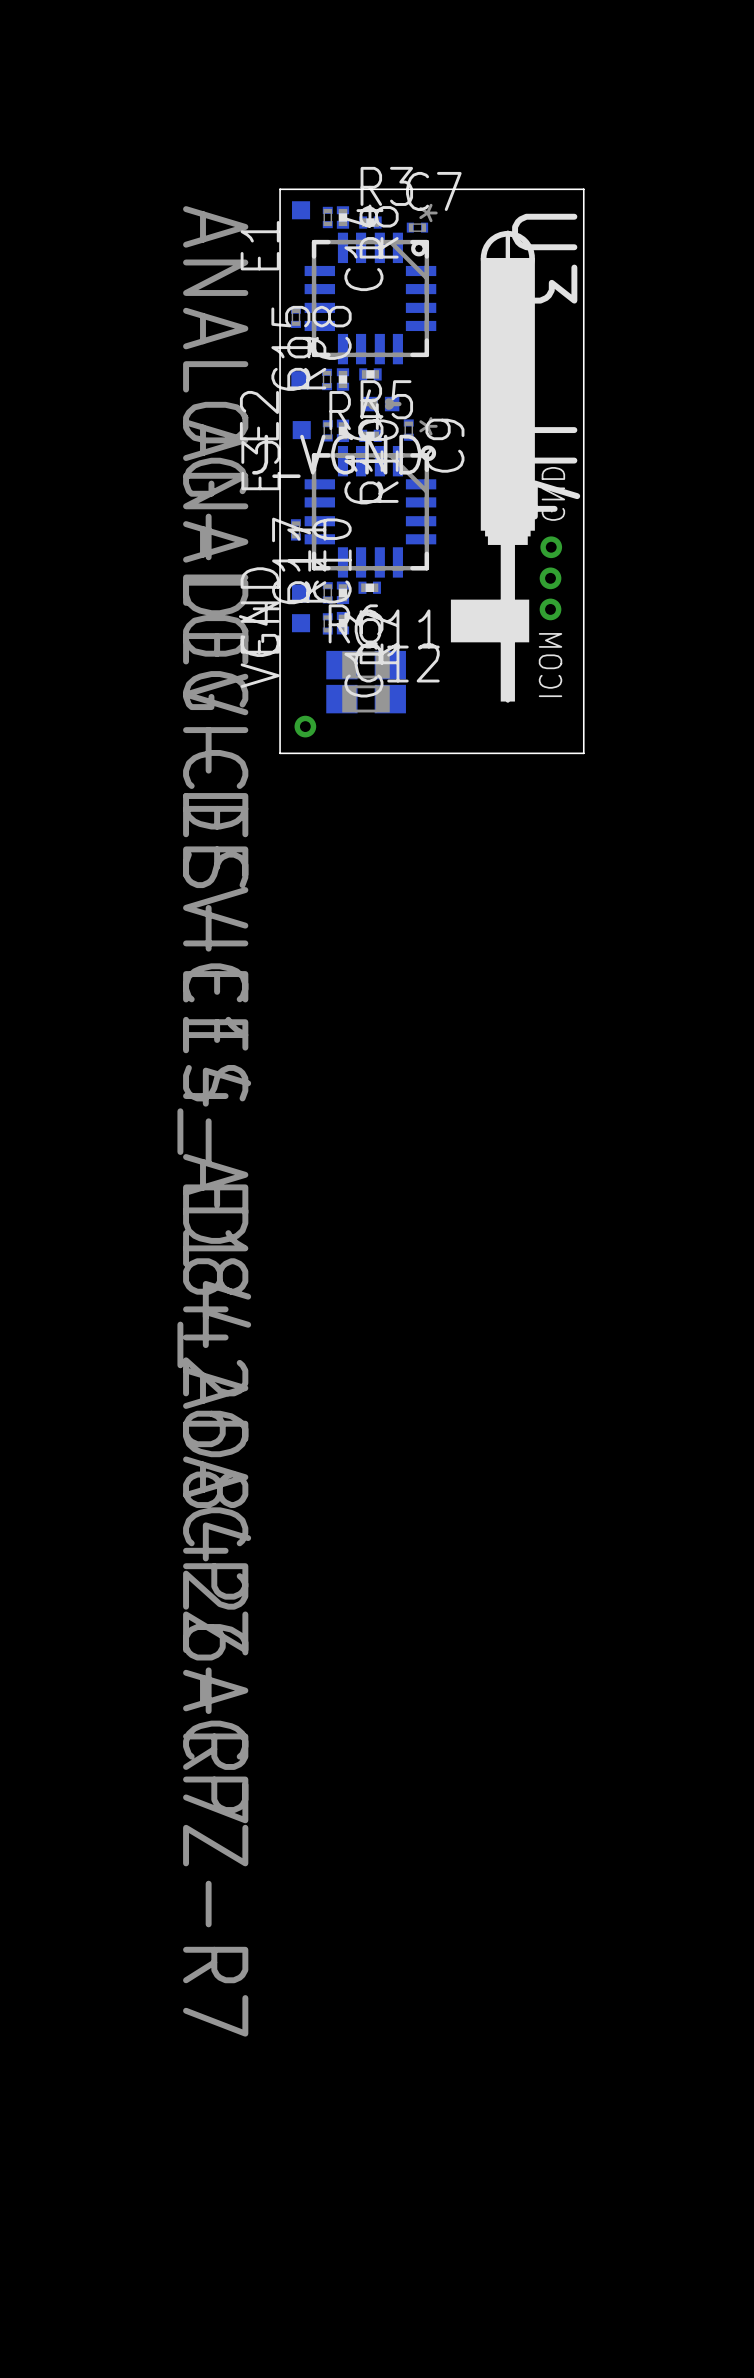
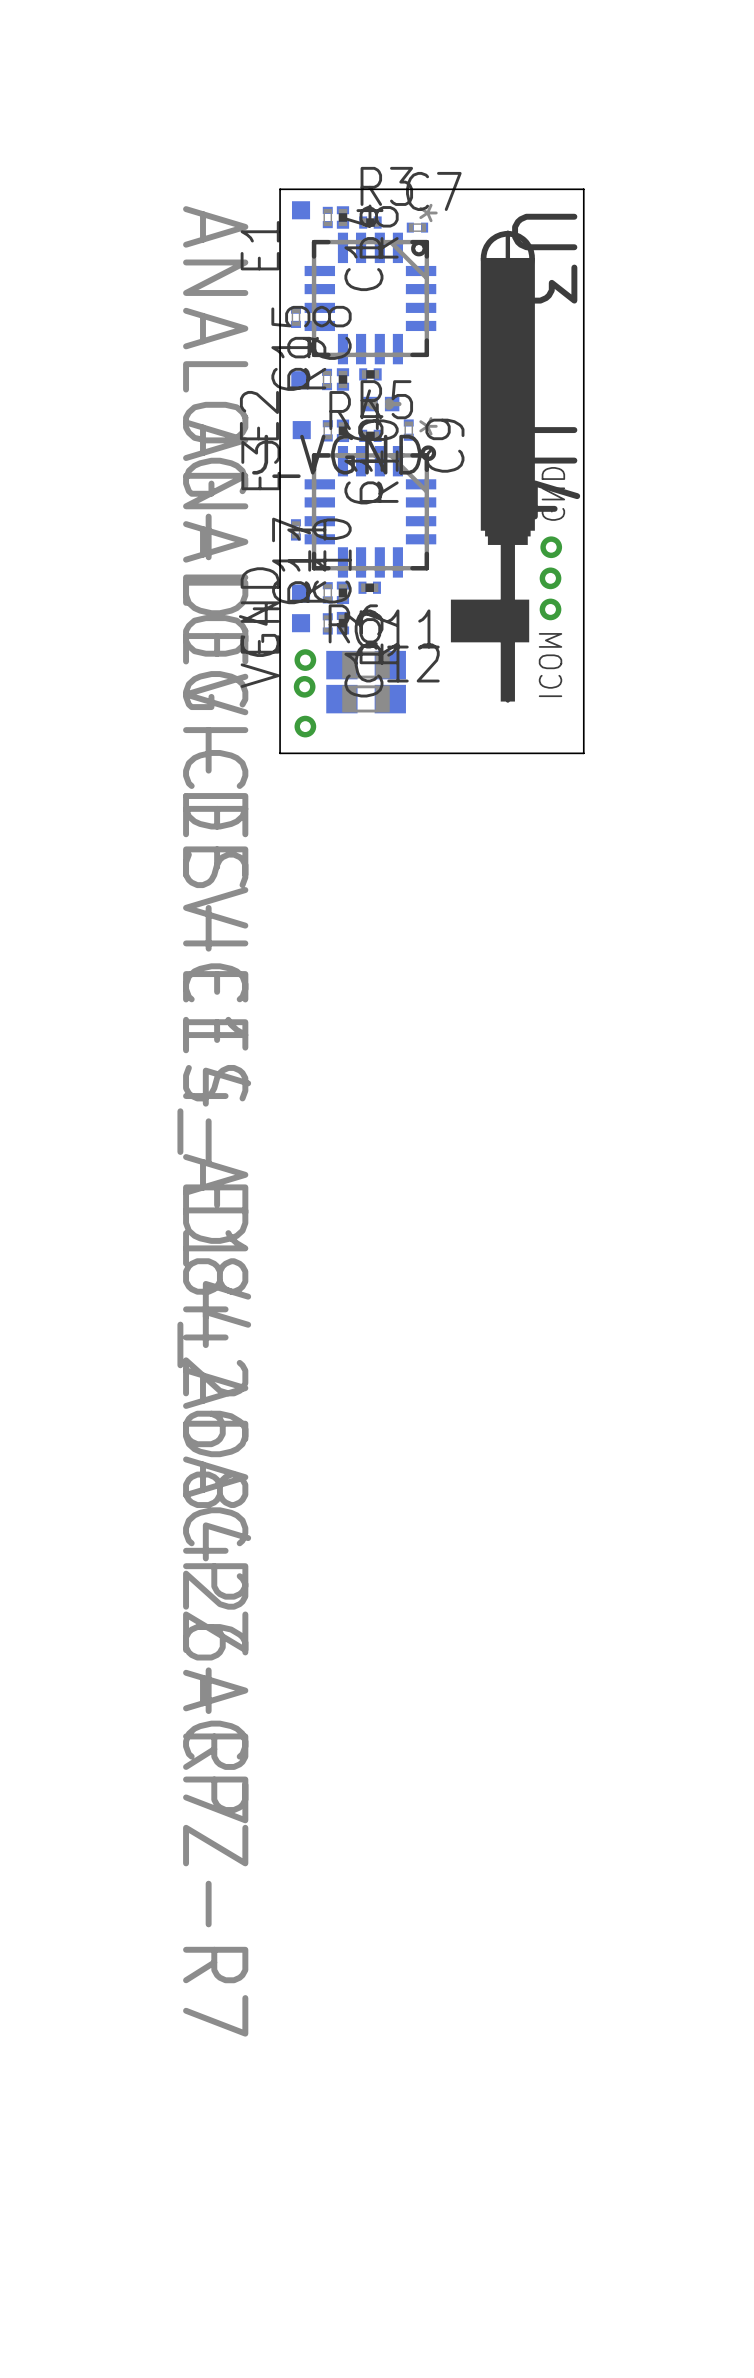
part: none -> (305, 660)
part: none -> (304, 686)

